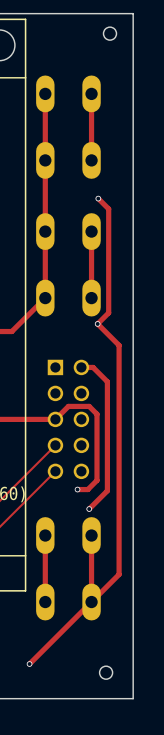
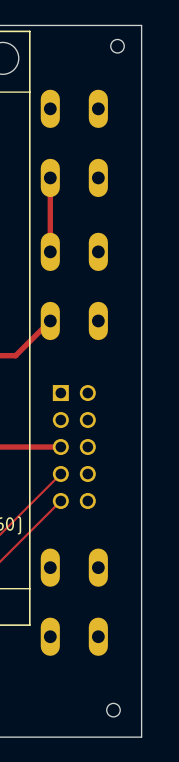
track: (45, 93) (45, 160) -> none
track: (91, 93) (91, 160) -> none
track: (98, 198) (108, 208) (108, 312) (97, 323) (119, 345) (119, 574) (29, 664) -> none
via: (98, 198) -> none
track: (45, 231) (45, 298) -> none
track: (91, 231) (91, 298) -> none
via: (97, 323) -> none
track: (81, 367) (93, 367) (107, 381) (107, 490) (89, 509) -> none
track: (55, 419) (68, 406) (89, 406) (97, 414) (97, 480) (87, 489) (77, 489) -> none
via: (77, 489) -> none
via: (89, 509) -> none
track: (45, 535) (45, 602) -> none
track: (91, 535) (91, 602) -> none
via: (29, 664) -> none

